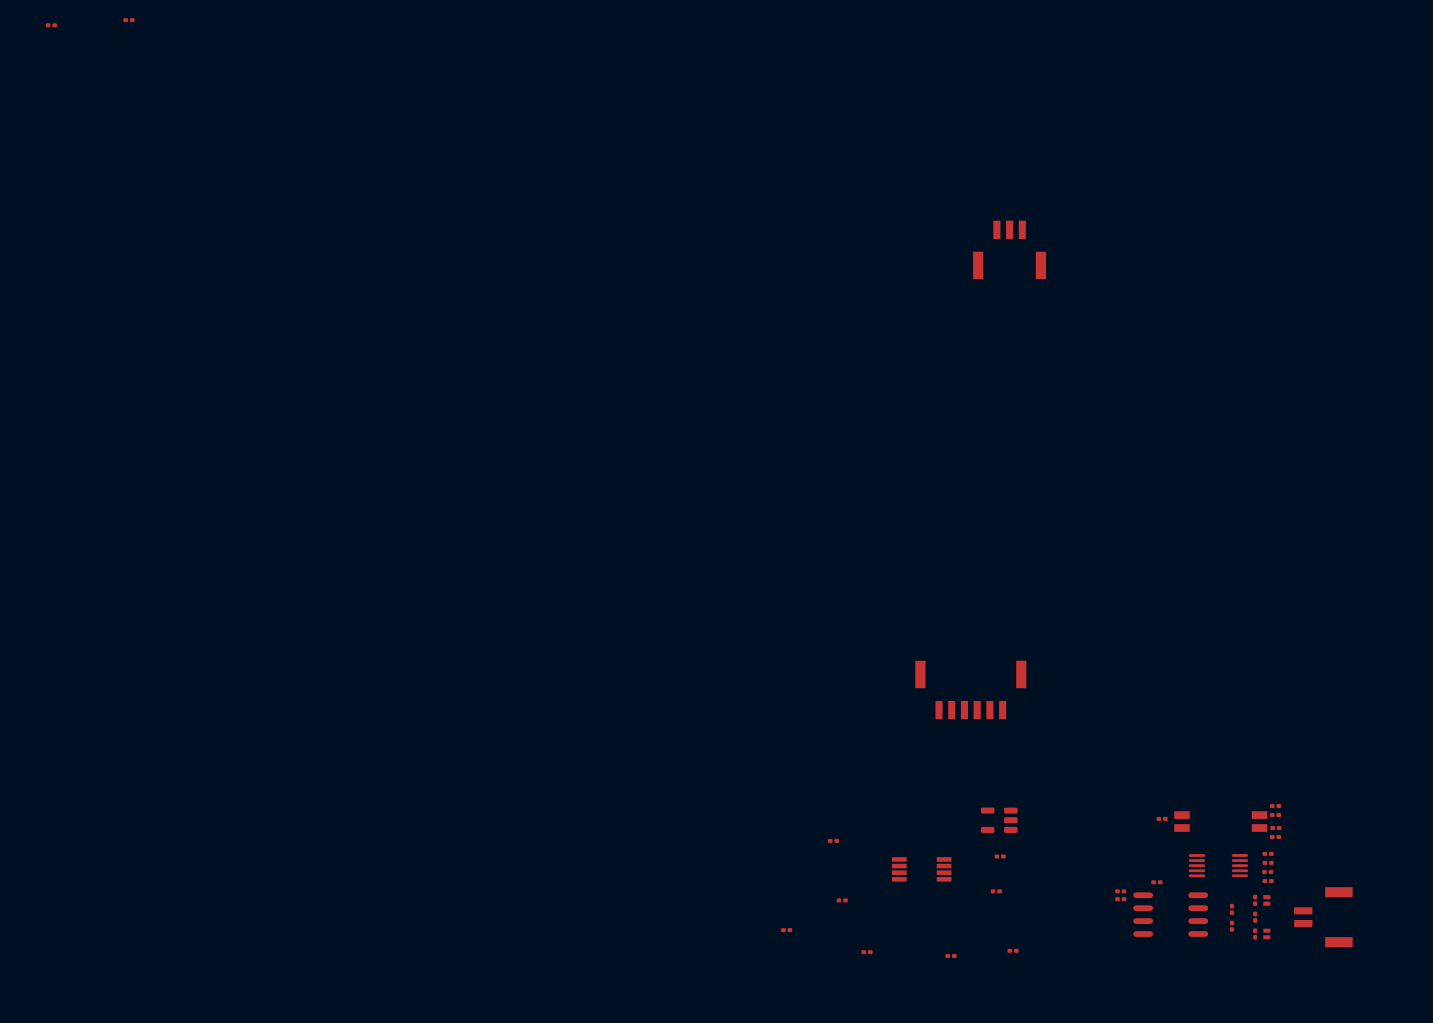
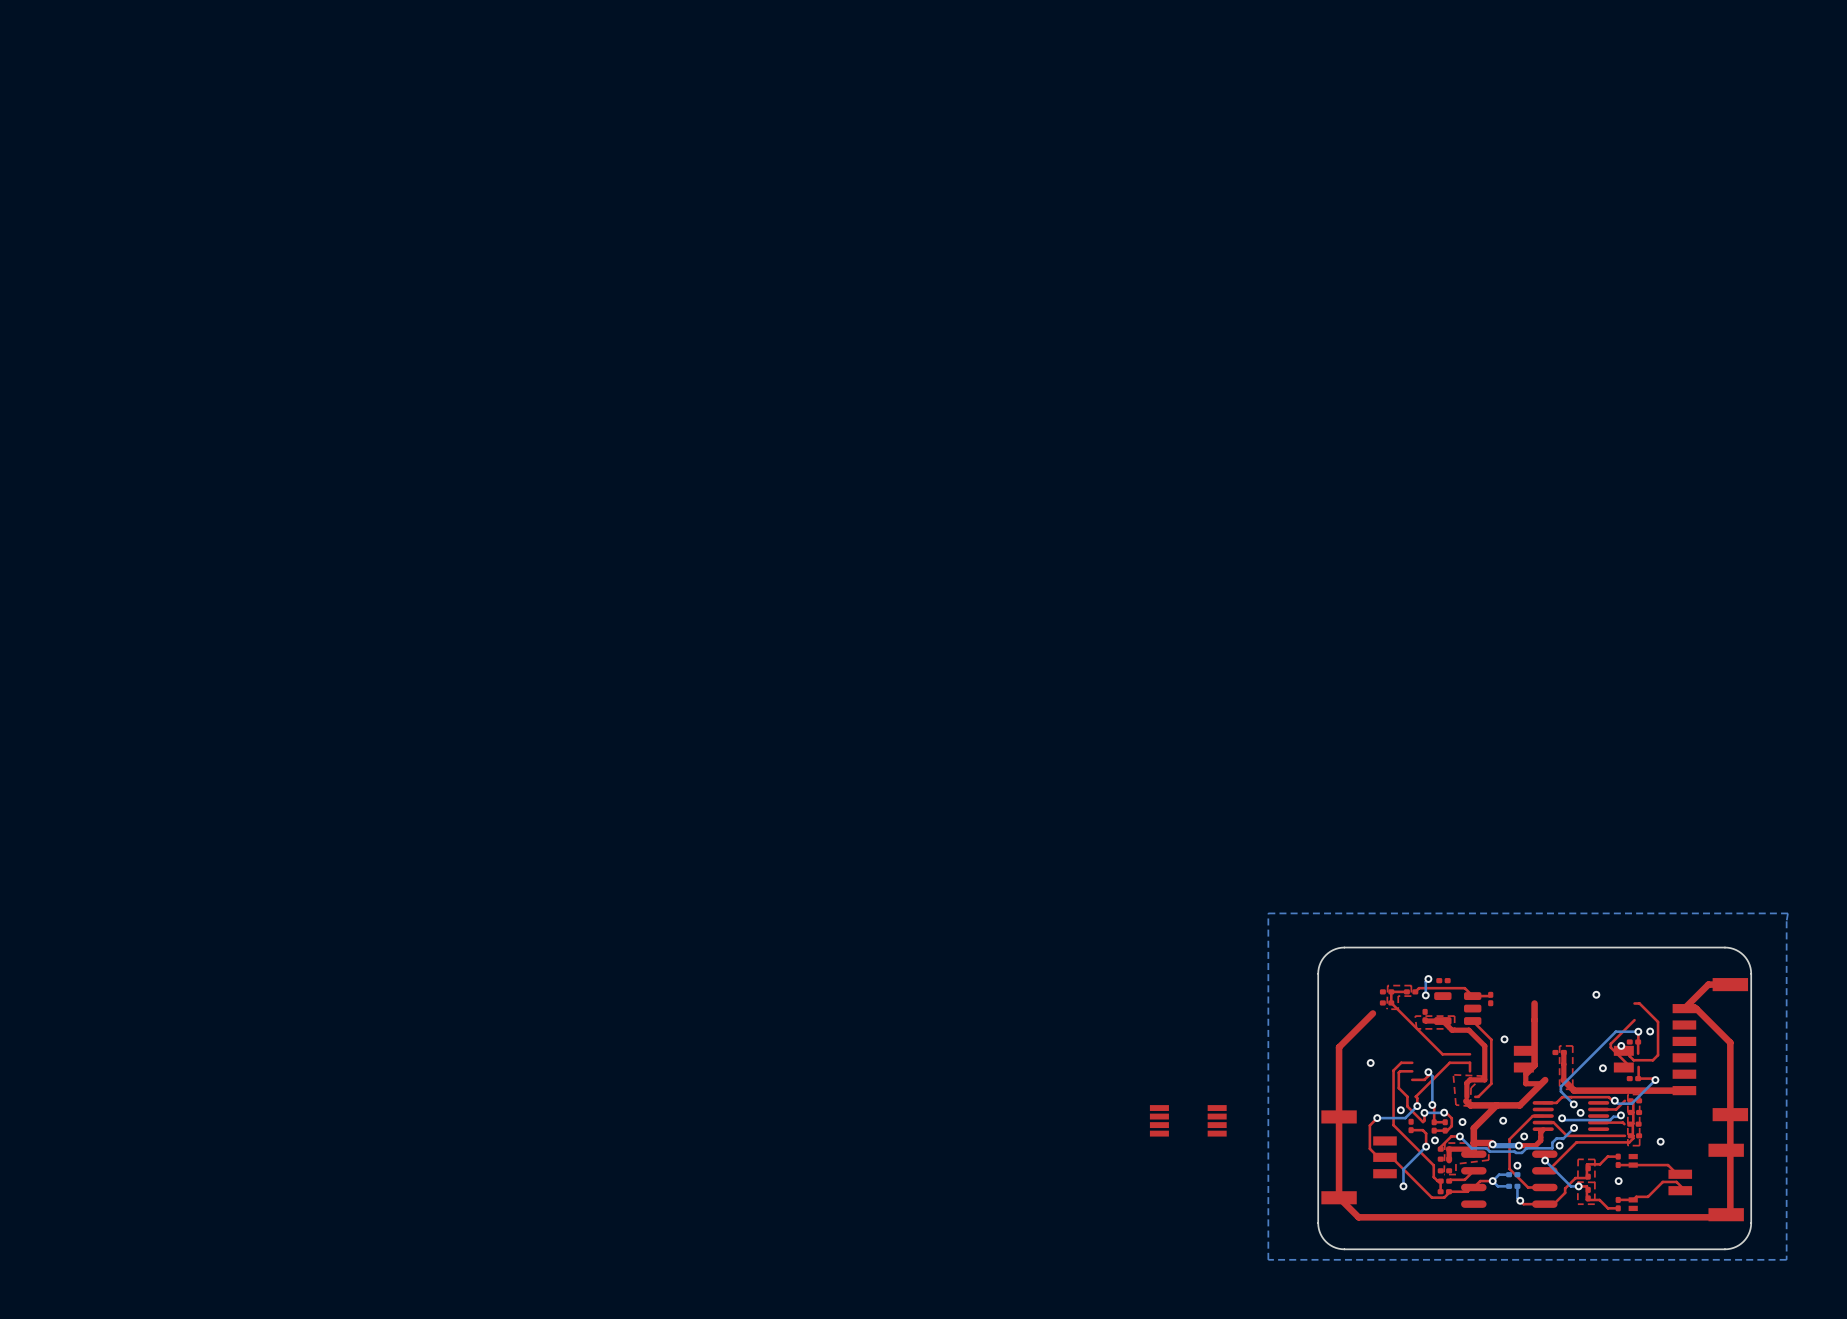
part: (128, 20) -> none
part: (51, 25) -> none
part: (1009, 249) -> none
part: (970, 690) -> none
bottom zone outline: none -> (1787, 913) (1268, 913) (1268, 1259) (1786, 1259) (1787, 913)
board edge: none -> (1724, 947) (1344, 947) (1328, 953) (1320, 962) (1318, 973) (1318, 1223) (1323, 1239) (1333, 1246) (1344, 1249) (1724, 1249) (1741, 1243) (1748, 1234) (1751, 1223) (1751, 973) (1749, 965) (1743, 955) (1733, 949) (1724, 947)
bottom track: none -> (1428, 979) (1425, 981) (1425, 995)
via: none -> (1428, 979)
part: none -> (1443, 980)
top track: none -> (1730, 984) (1708, 984) (1684, 1008) (1696, 1008) (1730, 1042) (1730, 1213) (1726, 1217) (1358, 1217) (1339, 1197) (1339, 1047) (1372, 1013)
top zone outline: none -> (1411, 985) (1387, 985) (1387, 1009) (1398, 1009) (1398, 996) (1411, 996) (1411, 985)
part: none -> (1387, 991)
top track: none -> (1406, 991) (1391, 991) (1391, 1002) (1442, 1054) (1470, 1054)
part: none -> (1411, 991)
top track: none -> (1415, 991) (1419, 988) (1464, 988) (1472, 996) (1490, 994)
via: none -> (1596, 994)
via: none -> (1425, 995)
part: none -> (1490, 999)
part: none -> (1387, 1002)
top track: none -> (1534, 1003) (1534, 1065) (1526, 1073)
top track: none -> (1634, 1003) (1639, 1003) (1658, 1021) (1658, 1055) (1652, 1060) (1633, 1060) (1629, 1053)
part: none -> (1425, 1016)
top zone outline: none -> (1454, 1016) (1454, 1028) (1416, 1028) (1415, 1016) (1454, 1016)
top track: none -> (1425, 1020) (1442, 1021) (1452, 1030) (1468, 1030) (1484, 1046) (1484, 1079) (1470, 1079) (1466, 1083) (1466, 1096)
top track: none -> (1472, 1021) (1491, 1039) (1491, 1083) (1478, 1096) (1475, 1096)
top track: none -> (1634, 1020) (1610, 1043) (1610, 1047) (1630, 1066)
top track: none -> (1638, 1031) (1638, 1053)
bottom track: none -> (1638, 1031) (1615, 1031) (1560, 1086) (1560, 1091) (1573, 1104)
via: none -> (1638, 1031)
via: none -> (1650, 1031)
via: none -> (1504, 1039)
part: (1275, 806) -> none
part: none -> (1633, 1042)
top zone outline: none -> (1572, 1045) (1572, 1089) (1559, 1089) (1559, 1045) (1572, 1045)
via: none -> (1621, 1045)
part: none -> (1710, 1049)
part: (1275, 815) -> none
part: none -> (1559, 1052)
top track: none -> (1563, 1052) (1563, 1080) (1574, 1090) (1684, 1090)
part: (1162, 818) -> none
part position: (999, 820) -> (1457, 1008)
via: none -> (1370, 1063)
top track: none -> (1412, 1062) (1401, 1062) (1393, 1070) (1393, 1125) (1433, 1165) (1433, 1177) (1440, 1181)
top track: none -> (1638, 1066) (1638, 1078) (1655, 1080)
via: none -> (1602, 1068)
part: (1275, 828) -> none
top track: none -> (1412, 1071) (1398, 1072) (1398, 1088) (1407, 1096) (1407, 1106) (1423, 1122) (1424, 1112)
top track: none -> (1470, 1071) (1470, 1062) (1449, 1062) (1415, 1096) (1417, 1106)
top track: none -> (1428, 1072) (1428, 1075) (1424, 1079) (1412, 1079)
bottom track: none -> (1428, 1072) (1432, 1076) (1432, 1104)
via: none -> (1428, 1072)
top track: none -> (1525, 1073) (1525, 1083) (1541, 1083) (1545, 1080) (1519, 1105) (1470, 1105) (1466, 1101)
top zone outline: none -> (1453, 1074) (1483, 1076) (1471, 1087) (1470, 1106) (1455, 1104) (1453, 1074)
part: none -> (1633, 1078)
part: (1275, 837) -> none
bottom track: none -> (1655, 1080) (1631, 1103) (1617, 1103) (1614, 1100)
via: none -> (1655, 1080)
part: (833, 840) -> none
top zone outline: none -> (1639, 1094) (1627, 1094) (1627, 1145) (1639, 1145) (1639, 1094)
top track: none -> (1571, 1097) (1562, 1097) (1556, 1102) (1543, 1102)
top track: none -> (1571, 1097) (1608, 1097) (1614, 1100)
via: none -> (1614, 1100)
top track: none -> (1624, 1100) (1616, 1109) (1598, 1109)
top track: none -> (1633, 1100) (1633, 1138) (1629, 1142) (1576, 1142) (1548, 1170) (1544, 1170)
part: (1000, 856) -> none
via: none -> (1573, 1104)
bottom track: none -> (1417, 1106) (1405, 1118) (1377, 1118)
via: none -> (1417, 1106)
top track: none -> (1432, 1104) (1434, 1106) (1434, 1122) (1445, 1122)
via: none -> (1432, 1104)
top track: none -> (1496, 1105) (1473, 1128) (1473, 1154) (1468, 1149) (1449, 1149) (1449, 1160)
via: none -> (1400, 1110)
via: none -> (1424, 1112)
top track: none -> (1444, 1112) (1451, 1118) (1451, 1126) (1447, 1130) (1434, 1130)
bottom track: none -> (1444, 1112) (1424, 1112)
via: none -> (1444, 1112)
via: none -> (1580, 1112)
top track: none -> (1543, 1116) (1532, 1116) (1509, 1139) (1509, 1168) (1528, 1187) (1544, 1187)
bottom track: none -> (1620, 1115) (1613, 1116) (1610, 1120) (1563, 1120) (1562, 1118)
via: none -> (1620, 1115)
top track: none -> (1377, 1118) (1369, 1125) (1369, 1148) (1378, 1157) (1392, 1157)
via: none -> (1377, 1118)
via: none -> (1562, 1118)
via: none -> (1503, 1120)
via: none -> (1462, 1122)
top track: none -> (1543, 1122) (1553, 1122) (1566, 1135) (1624, 1135)
top track: none -> (1598, 1122) (1624, 1124)
part: none -> (1411, 1125)
part: none -> (1434, 1126)
part: none -> (1445, 1126)
bottom track: none -> (1574, 1127) (1563, 1138) (1556, 1138) (1552, 1142) (1552, 1148) (1526, 1148) (1521, 1152) (1489, 1151) (1486, 1148) (1471, 1148) (1459, 1136)
via: none -> (1574, 1127)
top track: none -> (1411, 1130) (1422, 1130) (1426, 1133) (1426, 1146)
top track: none -> (1543, 1129) (1540, 1132) (1540, 1140) (1535, 1145) (1518, 1145)
top track: none -> (1459, 1136) (1451, 1136) (1440, 1149)
via: none -> (1459, 1136)
via: none -> (1524, 1136)
part: (1156, 882) -> none
via: none -> (1434, 1140)
via: none -> (1660, 1141)
top track: none -> (1473, 1143) (1492, 1144)
top zone outline: none -> (1488, 1143) (1444, 1143) (1444, 1174) (1455, 1174) (1455, 1164) (1488, 1160) (1488, 1143)
bottom track: none -> (1492, 1144) (1518, 1145)
via: none -> (1492, 1144)
via: none -> (1518, 1145)
via: none -> (1559, 1145)
bottom track: none -> (1426, 1146) (1403, 1169) (1403, 1186)
via: none -> (1426, 1146)
part: (996, 891) -> none
part: none -> (1359, 1157)
top track: none -> (1391, 1157) (1431, 1197) (1444, 1197) (1449, 1191) (1467, 1191) (1480, 1181) (1492, 1181)
top track: none -> (1618, 1156) (1607, 1156) (1599, 1164) (1587, 1164) (1586, 1178) (1575, 1178) (1553, 1204) (1523, 1204) (1520, 1200)
part: (842, 900) -> none
bottom track: none -> (1545, 1160) (1570, 1186) (1578, 1186)
via: none -> (1545, 1160)
top track: none -> (1618, 1165) (1668, 1165) (1676, 1173) (1684, 1173)
via: none -> (1517, 1165)
part: none -> (1444, 1170)
top track: none -> (1473, 1170) (1464, 1179) (1449, 1181)
bottom track: none -> (1509, 1174) (1499, 1174) (1492, 1181) (1497, 1186) (1509, 1186)
part: none -> (1513, 1174)
top track: none -> (1440, 1181) (1440, 1191)
part: none -> (1444, 1181)
via: none -> (1492, 1181)
top zone outline: none -> (1577, 1182) (1594, 1182)
top zone outline: none -> (1577, 1182) (1577, 1204) (1594, 1204) (1594, 1182)
top zone outline: none -> (1577, 1182) (1578, 1159) (1594, 1159) (1594, 1182)
via: none -> (1618, 1181)
part: (1255, 917) -> none
via: none -> (1403, 1186)
part: none -> (1513, 1186)
bottom track: none -> (1517, 1186) (1517, 1197) (1520, 1200)
top track: none -> (1578, 1186) (1586, 1186) (1587, 1199) (1599, 1199) (1608, 1208) (1618, 1208)
via: none -> (1578, 1186)
top track: none -> (1684, 1189) (1676, 1181) (1662, 1181) (1647, 1196) (1636, 1196) (1633, 1199) (1618, 1199)
part: none -> (1444, 1191)
part: (786, 930) -> none
via: none -> (1520, 1200)
part: (1013, 950) -> none
part: (867, 952) -> none
part: (951, 955) -> none

